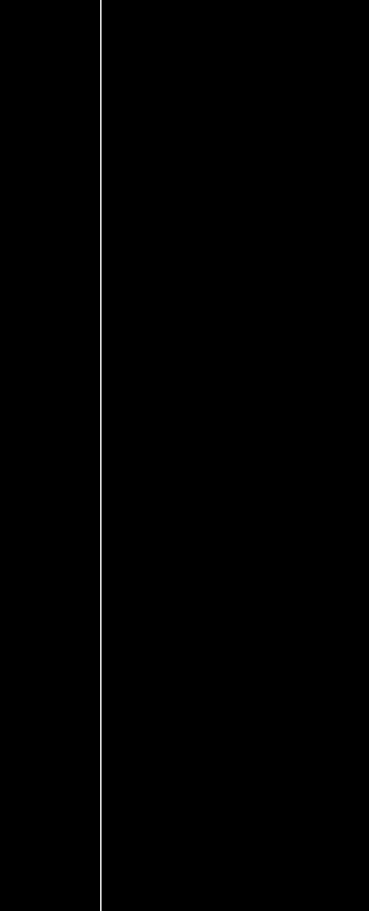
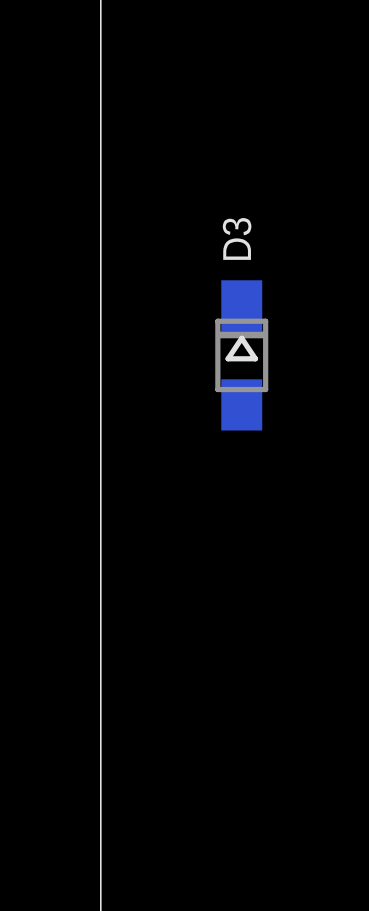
D3: none -> (241, 355)

